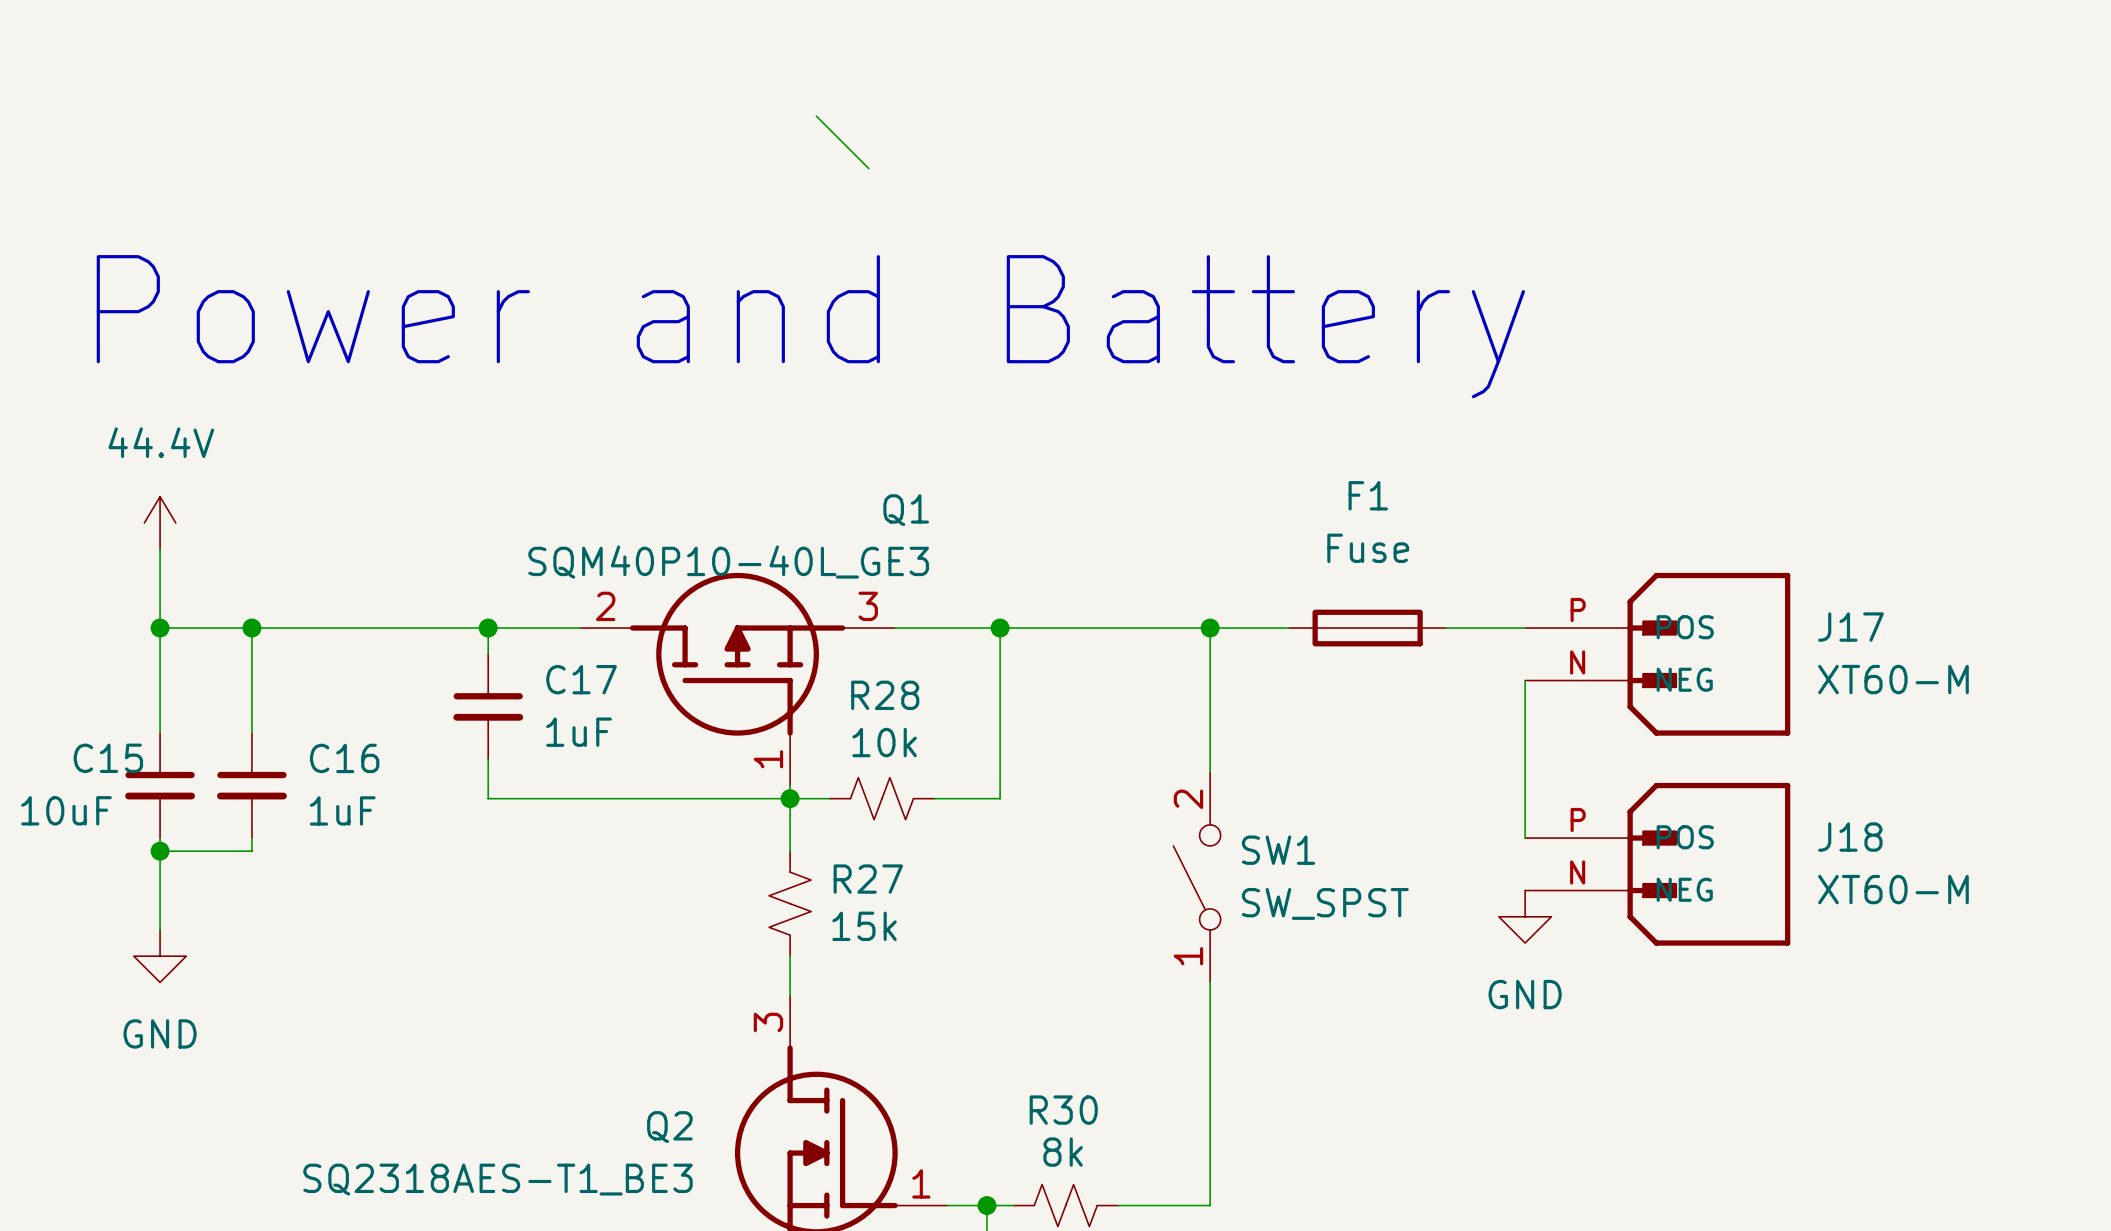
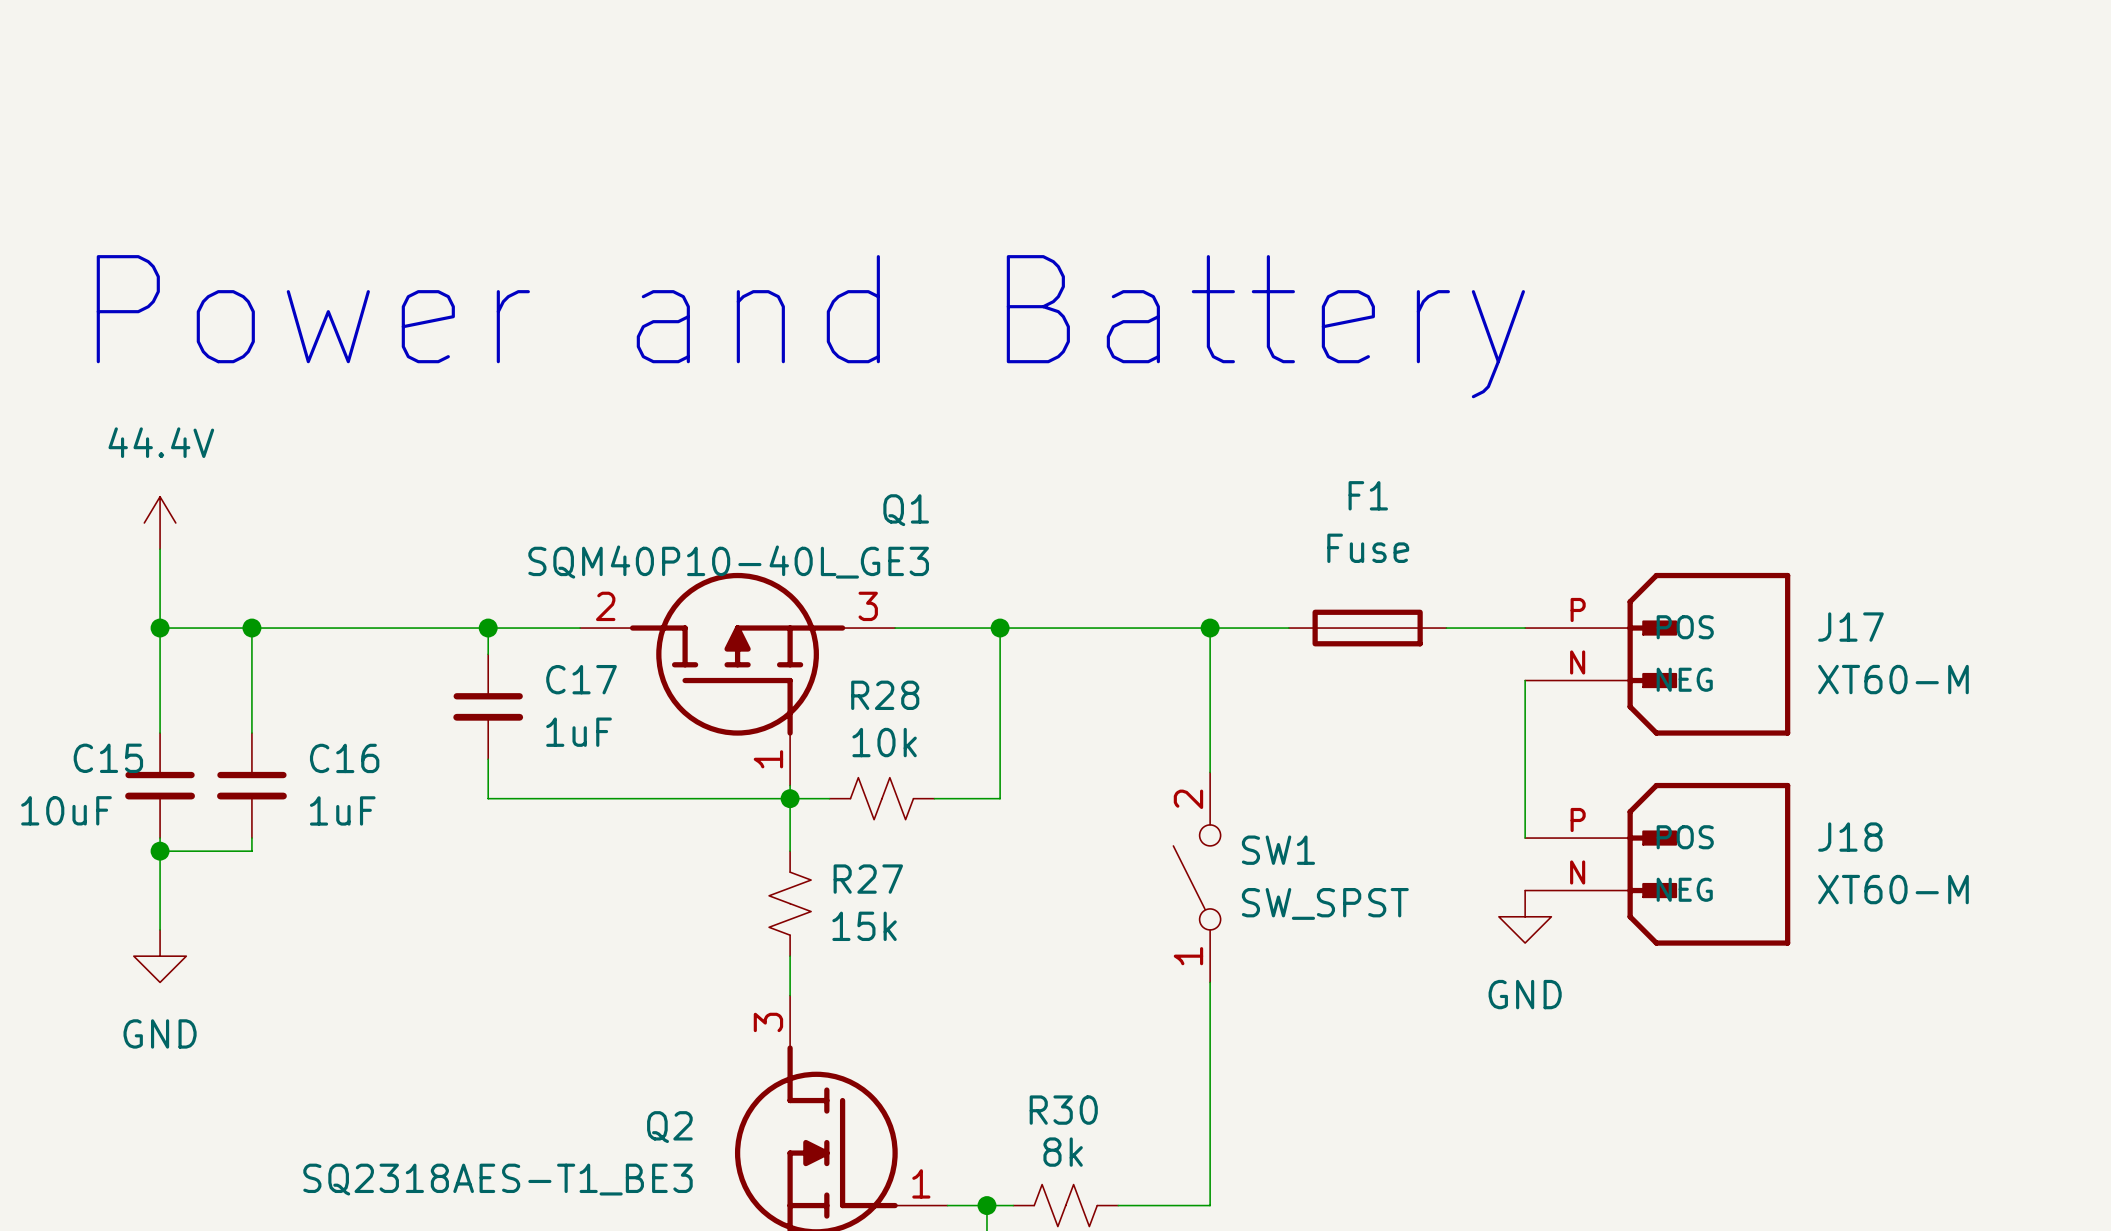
wire: (816, 116) (868, 168) -> none

